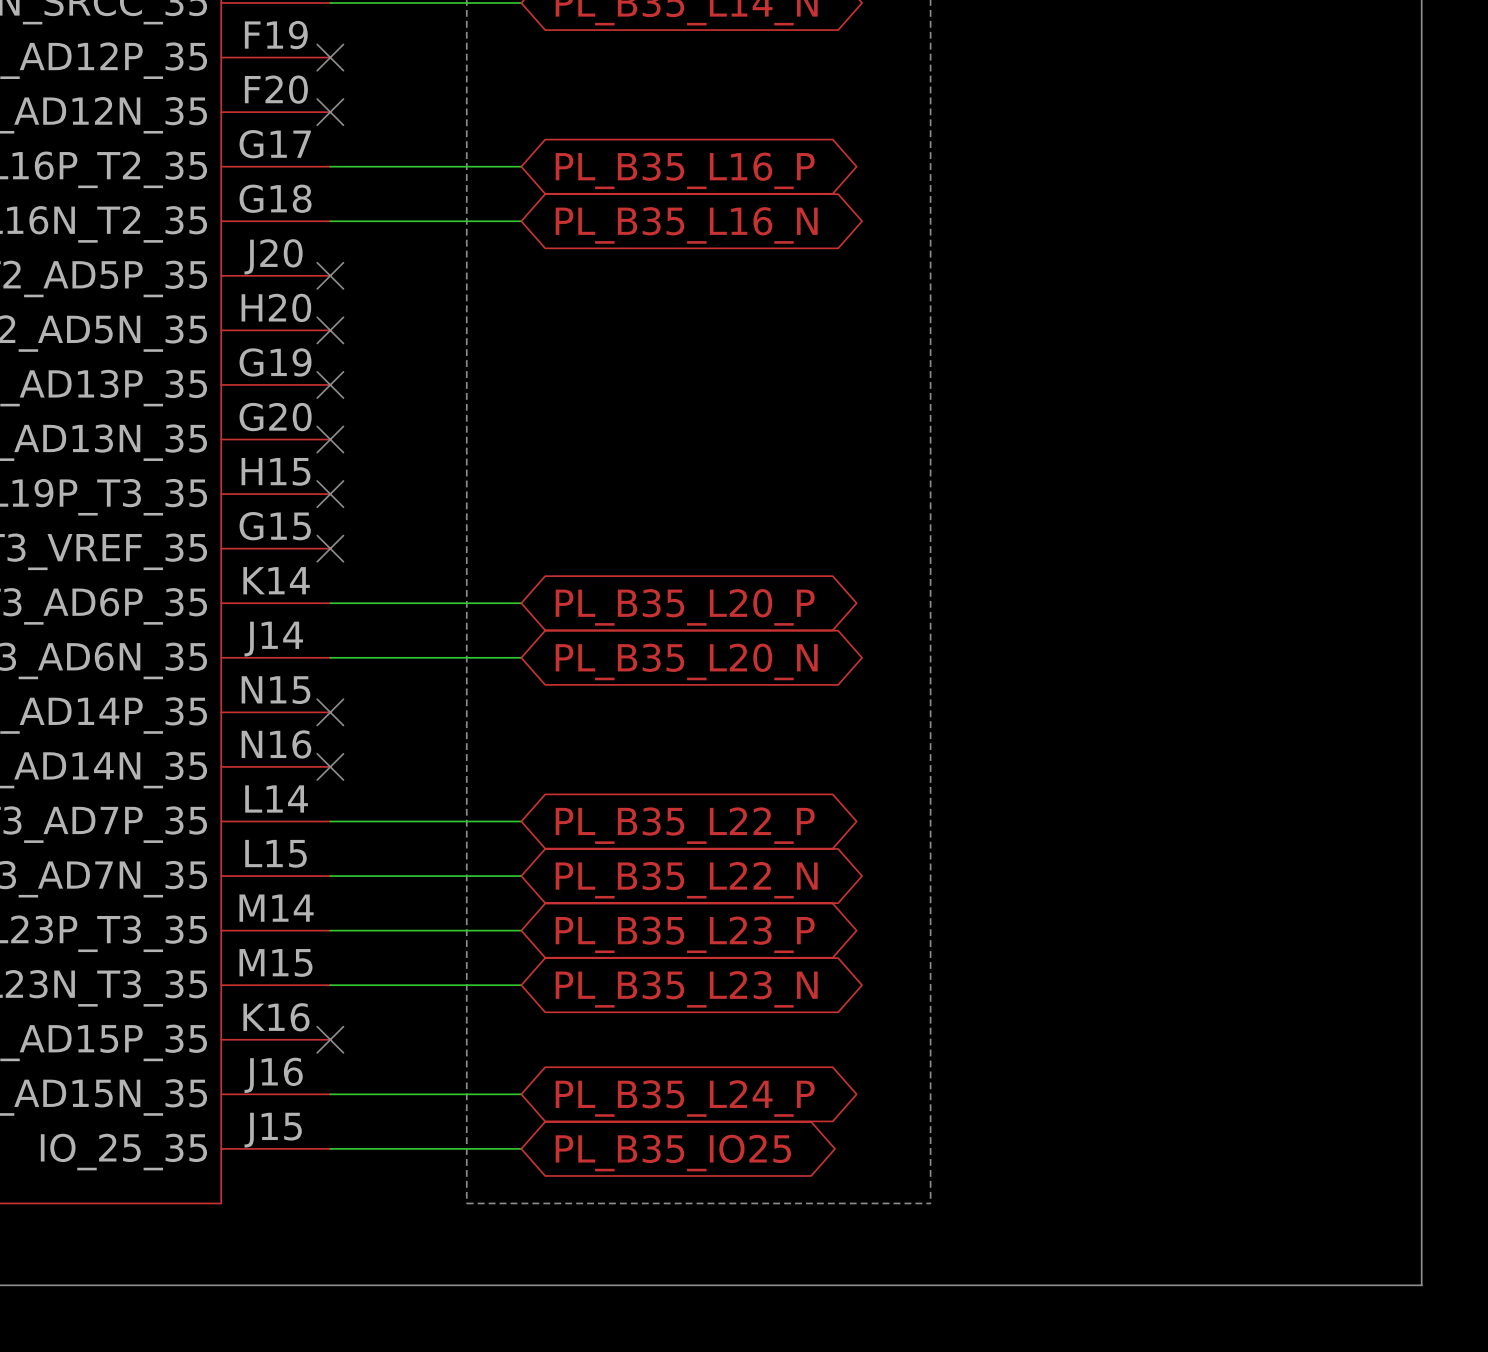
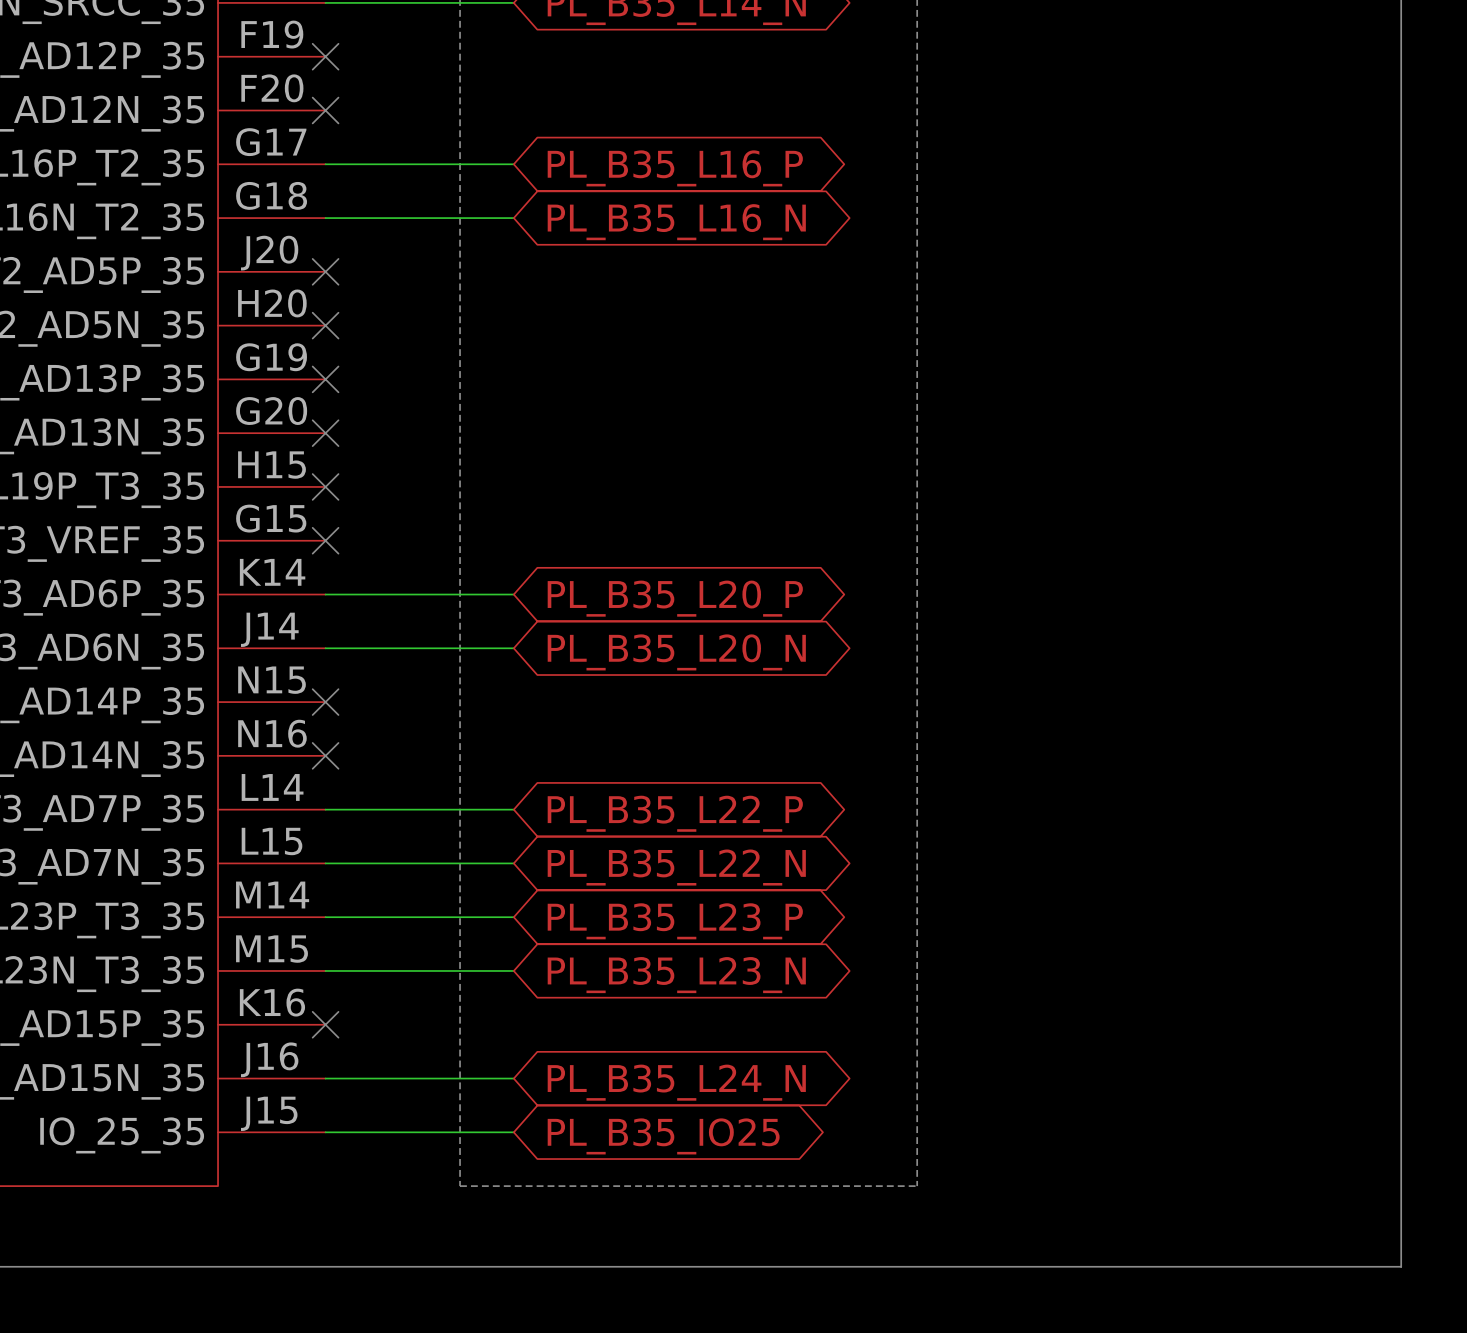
global label: PL_B35_L24_P (685, 1098) -> PL_B35_L24_N (676, 1082)

